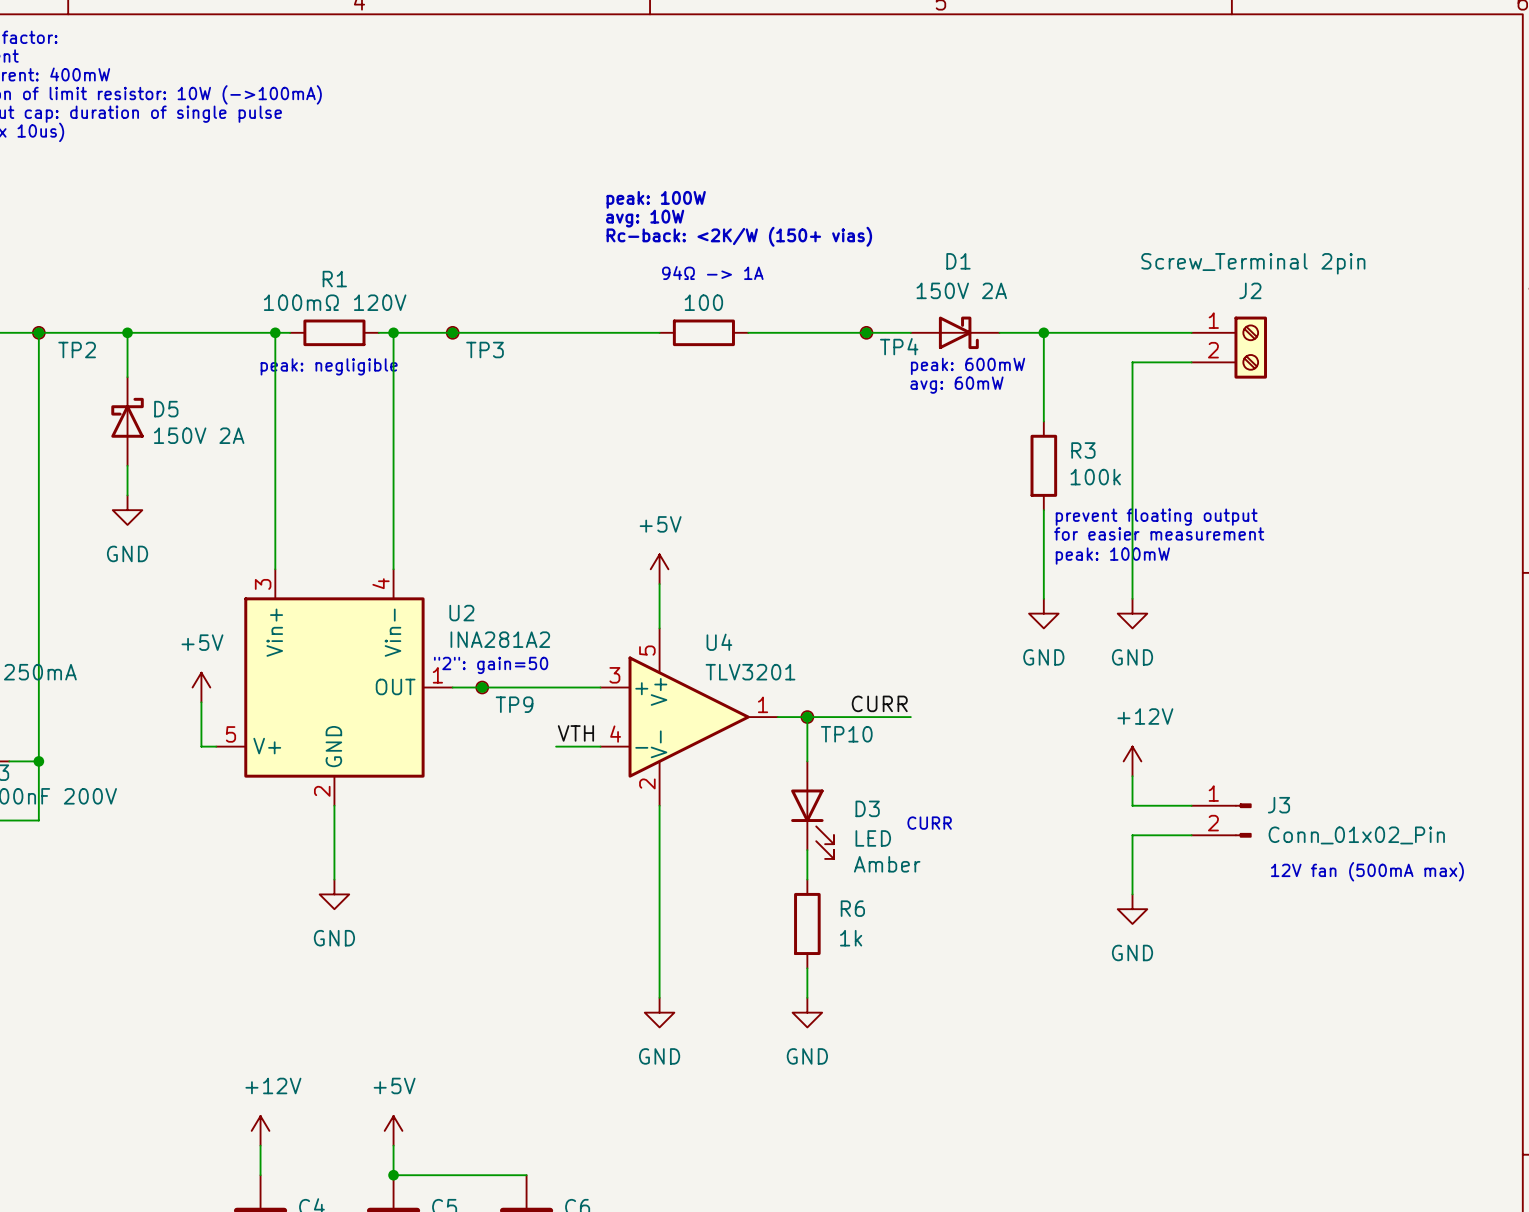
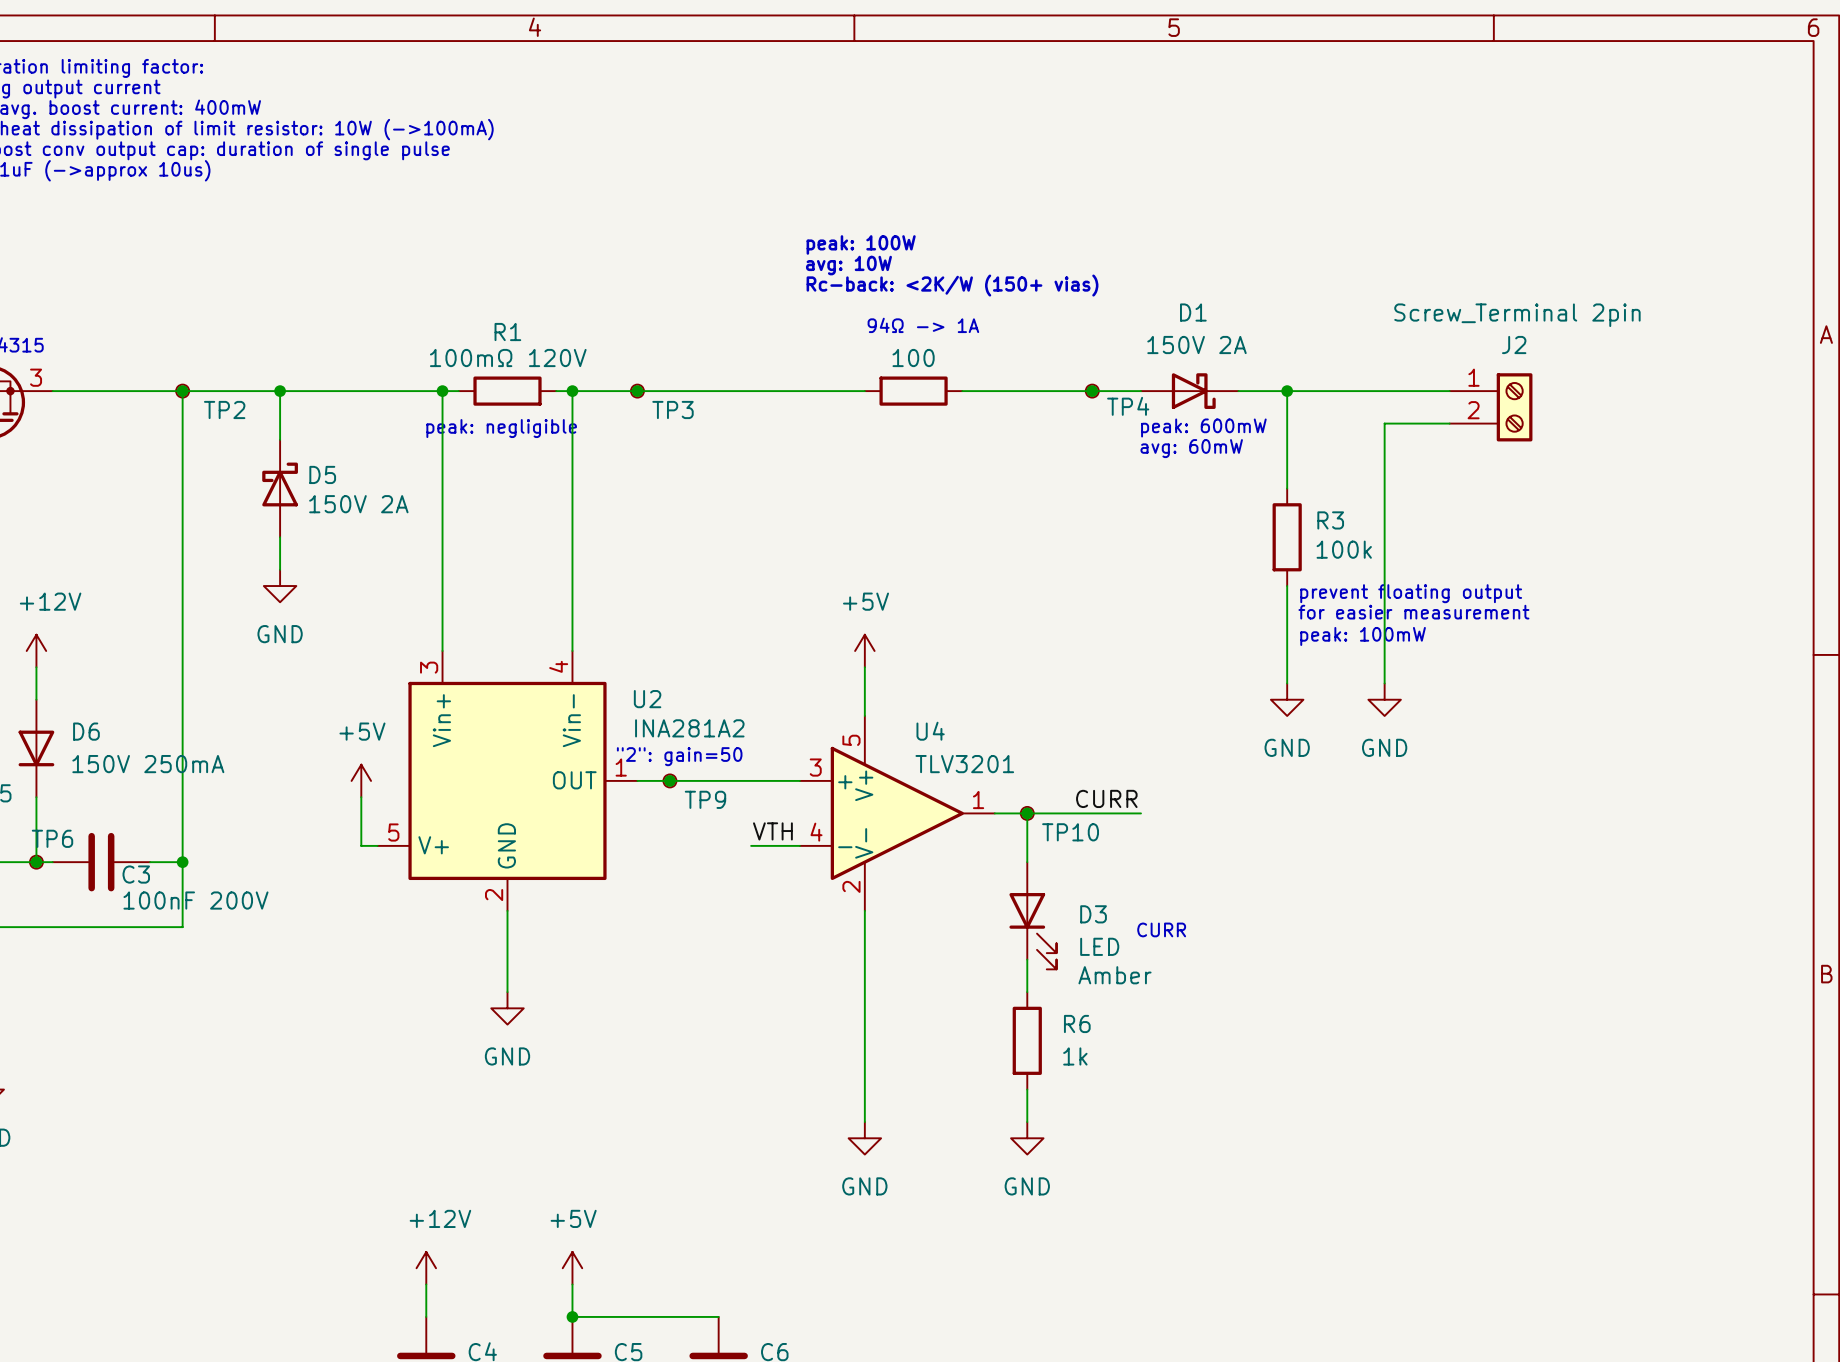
power symbol: +12V (1132, 761) -> none
wire: (1132, 776) (1132, 805) (1191, 805) -> none
J3: Conn_01x02_Pin (1221, 820) -> none
wire: (1191, 835) (1132, 835) (1132, 894) -> none
text: 12V fan (500mA max) (1367, 871) -> none
power symbol: GND (1132, 909) -> none

